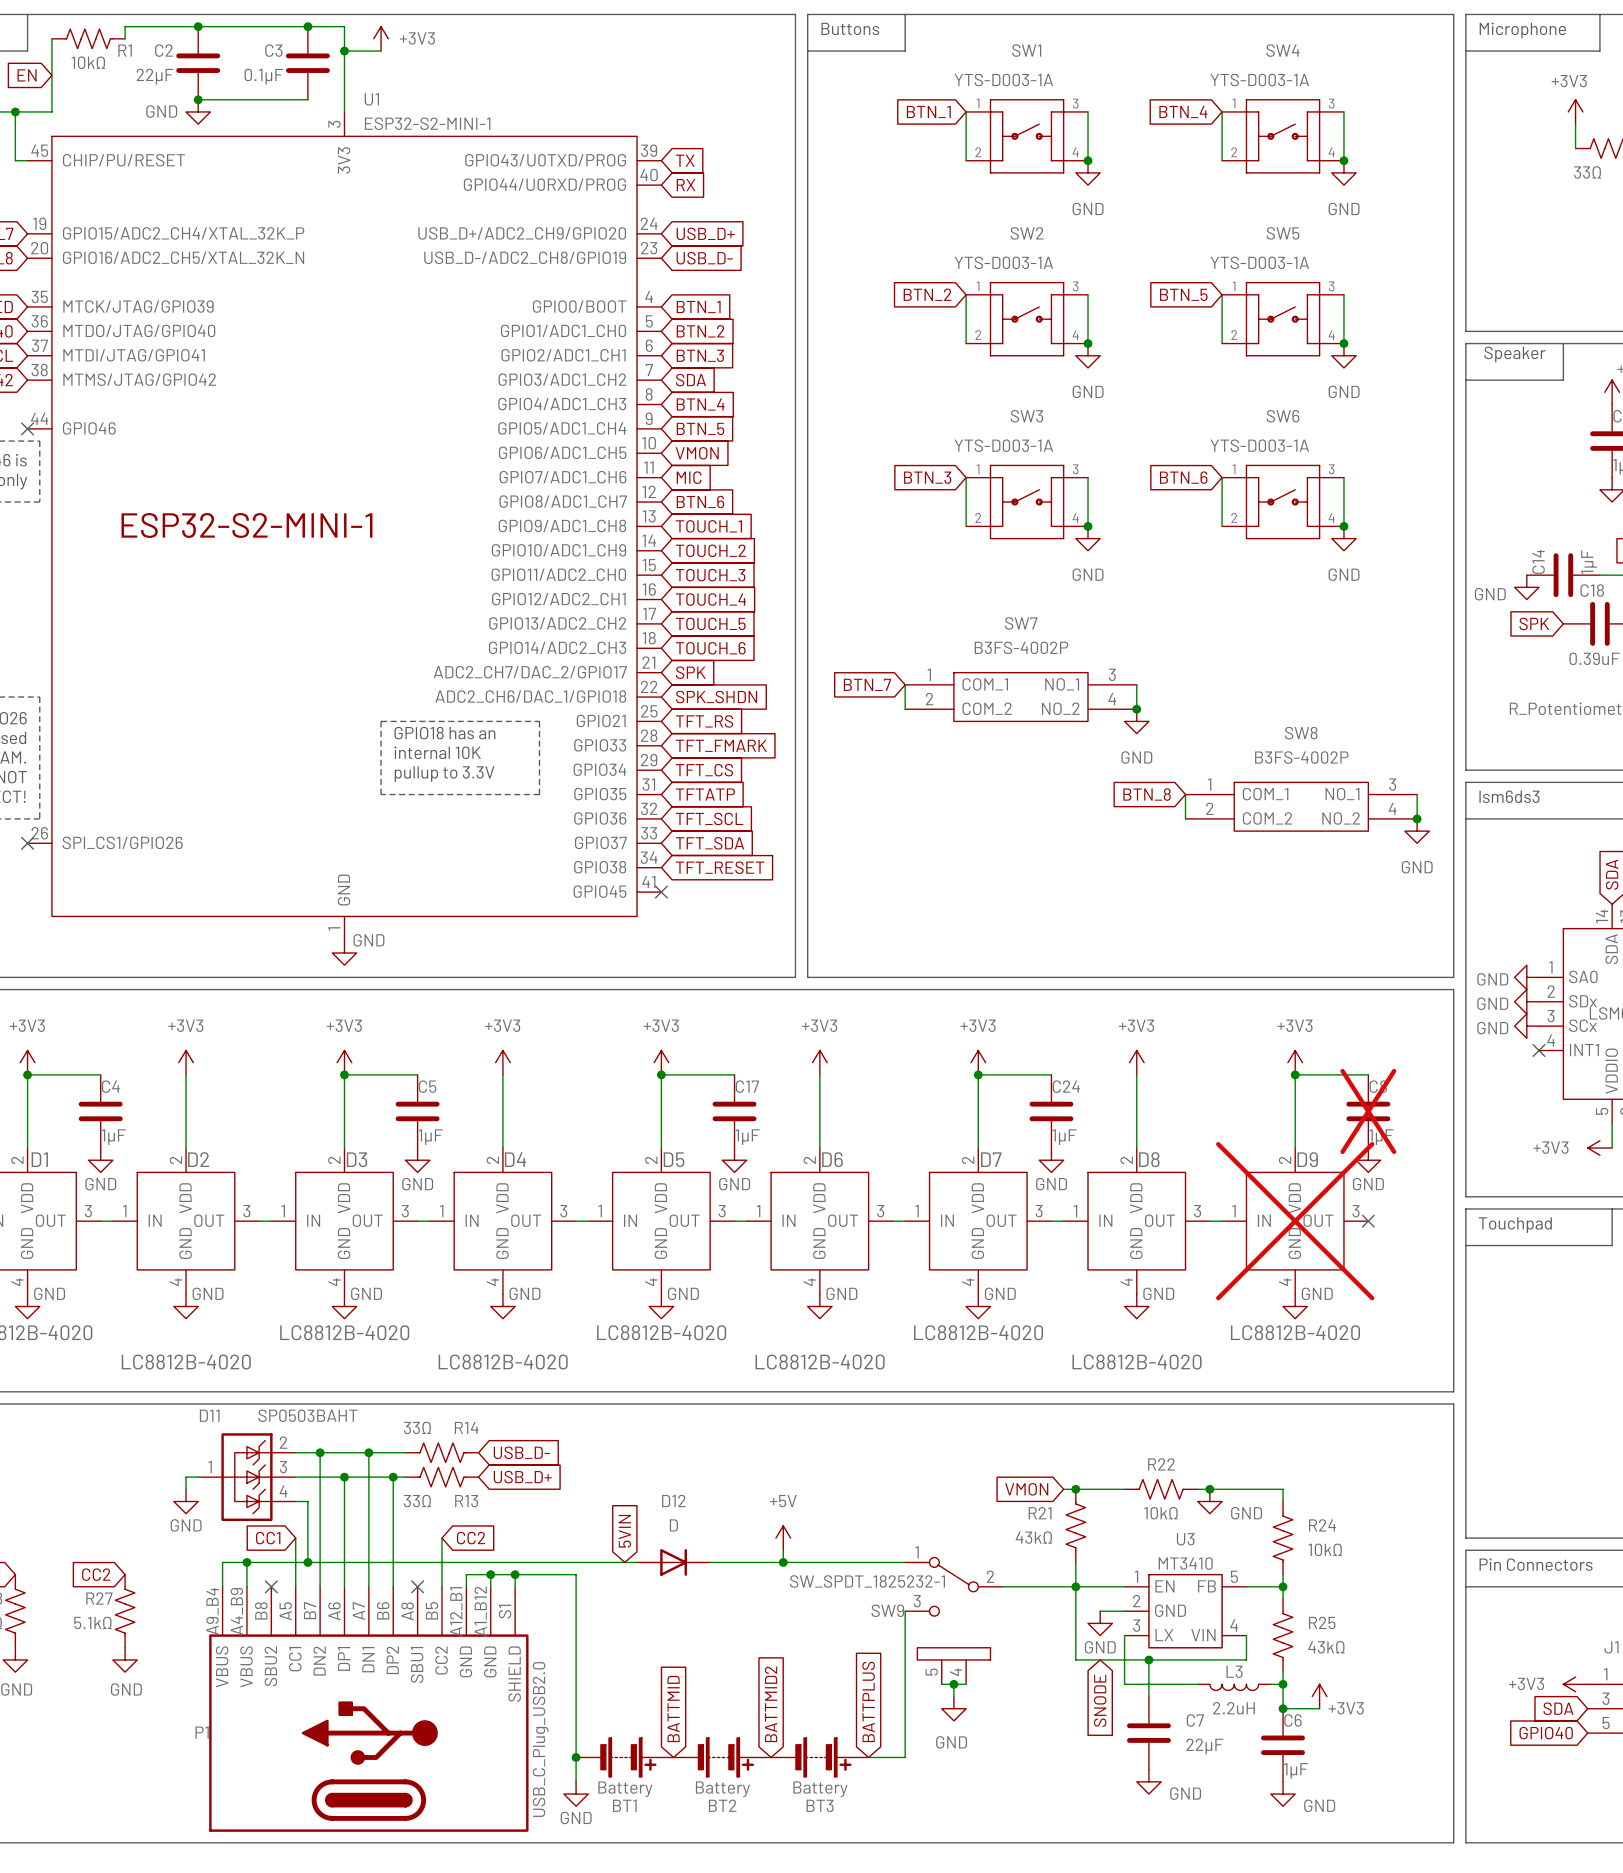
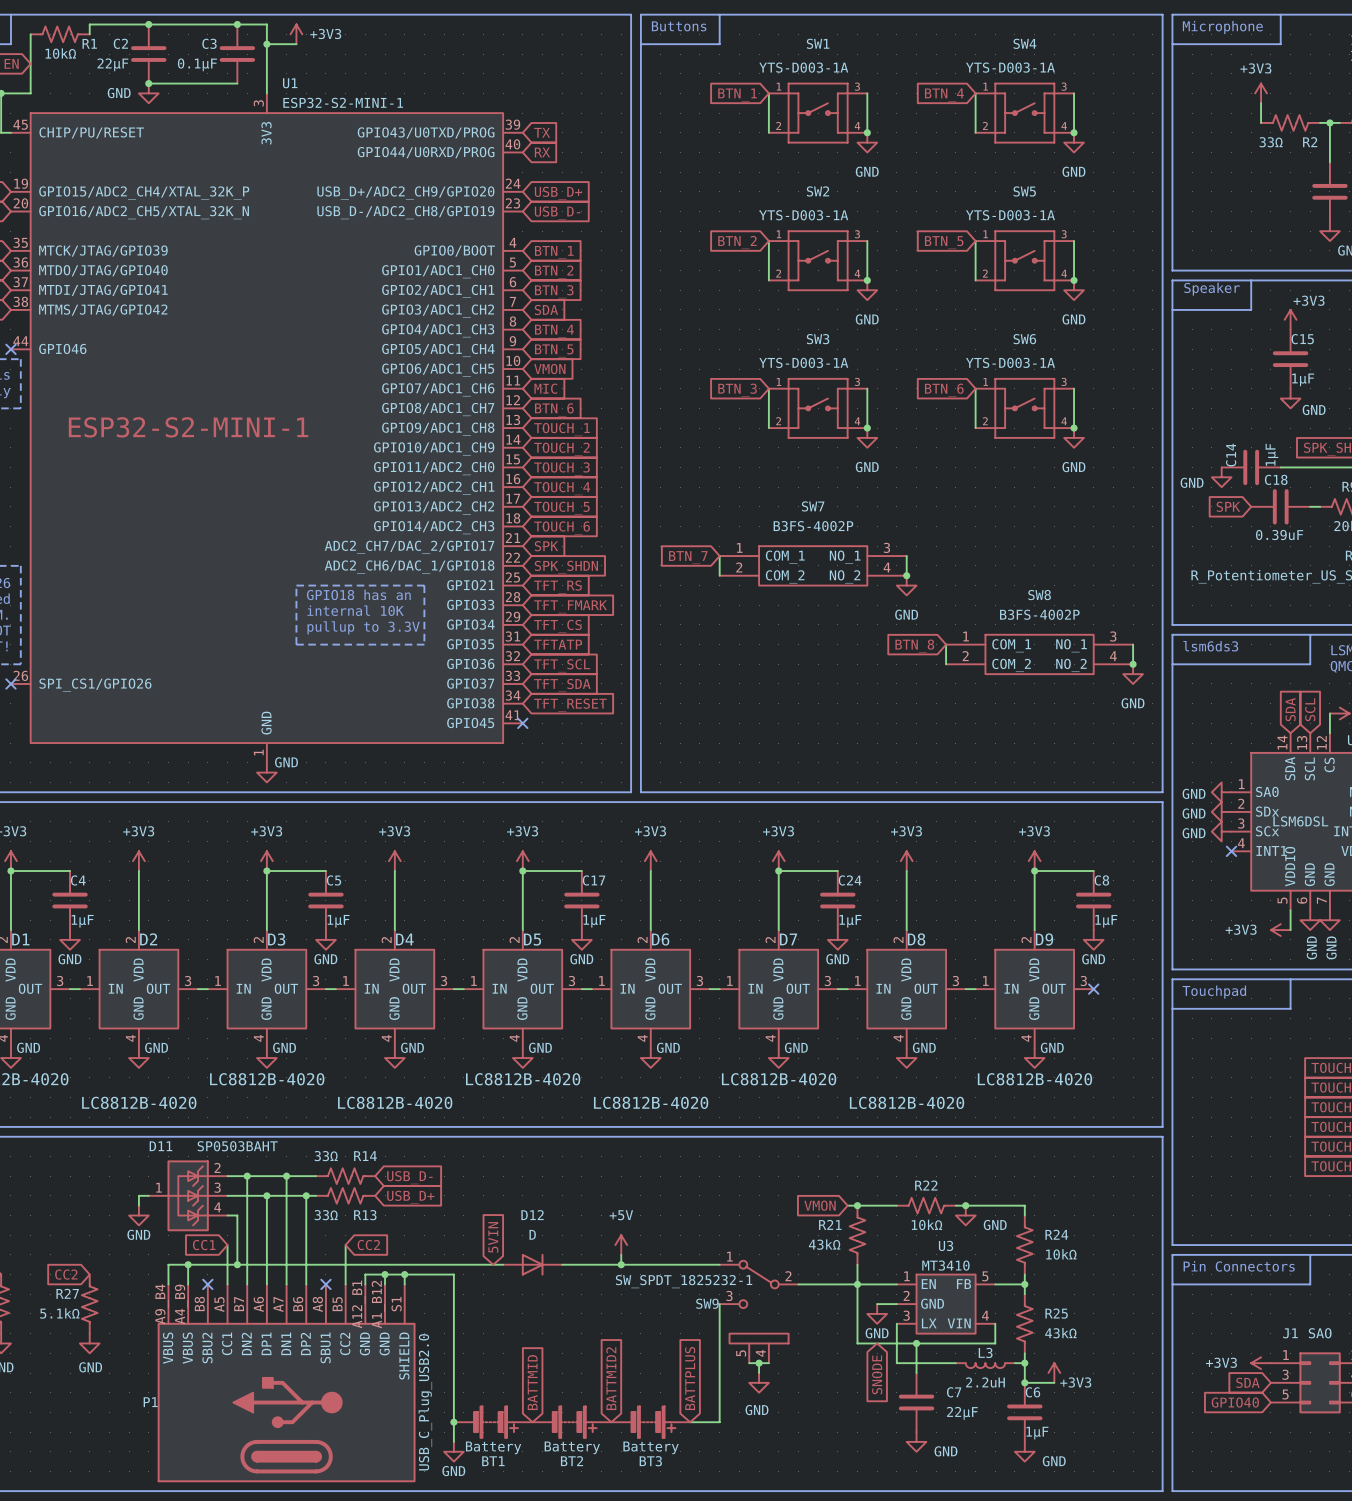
C8 do-not-place cross: (1368, 1111) -> none
D9 do-not-place cross: (1295, 1221) -> none

